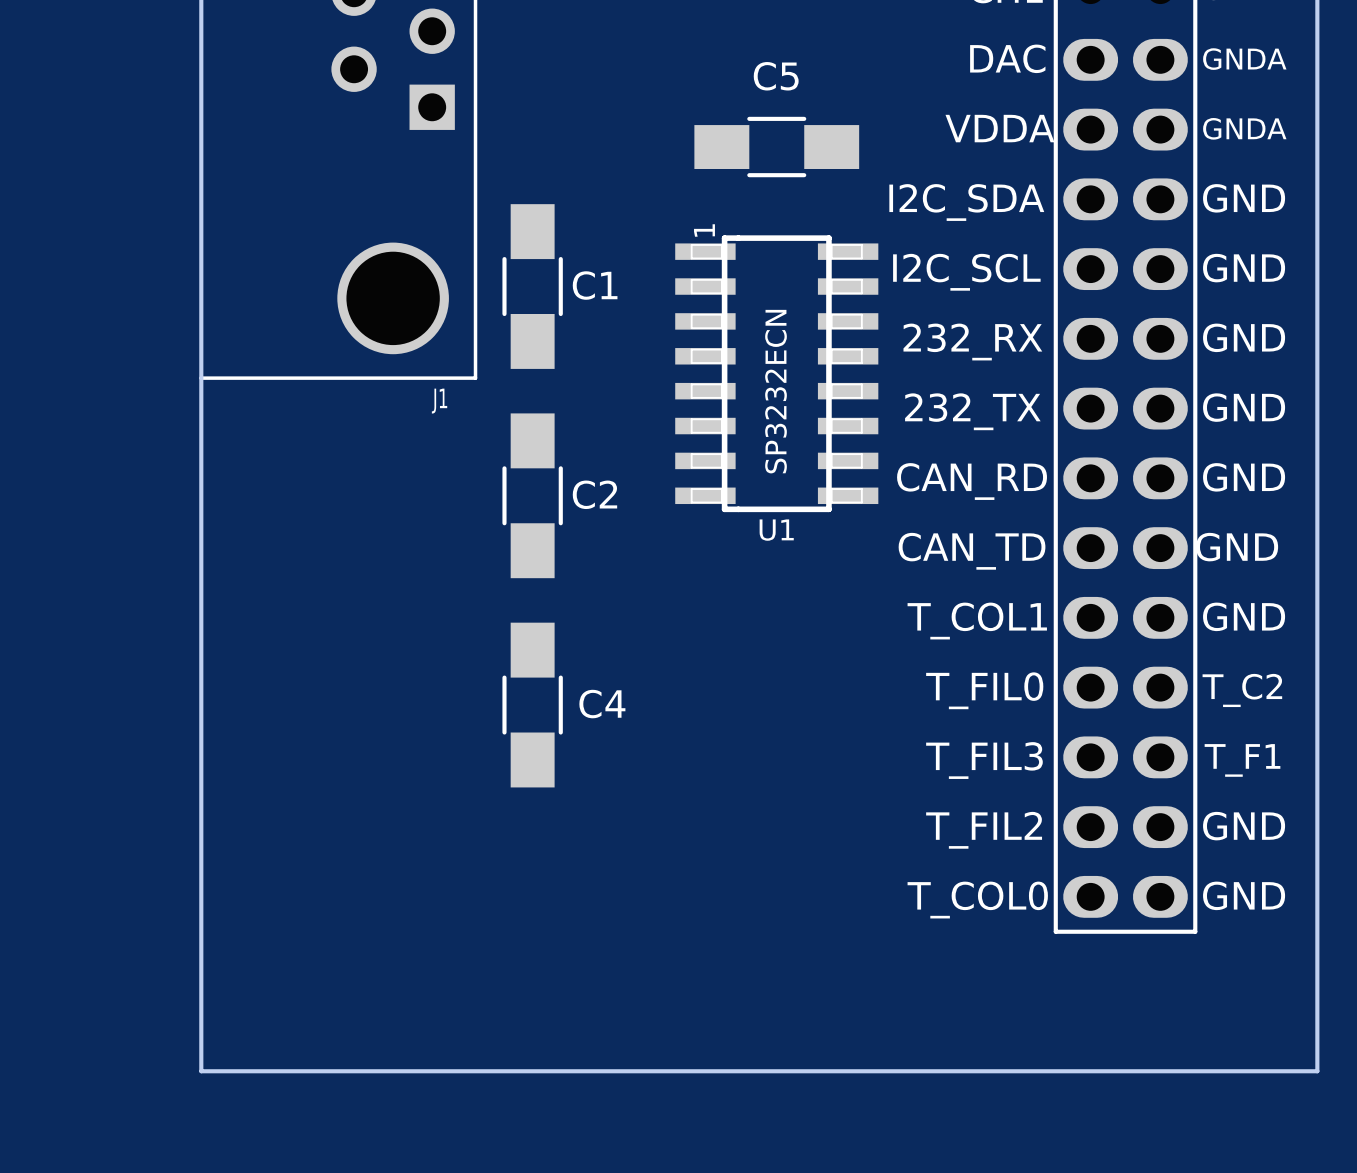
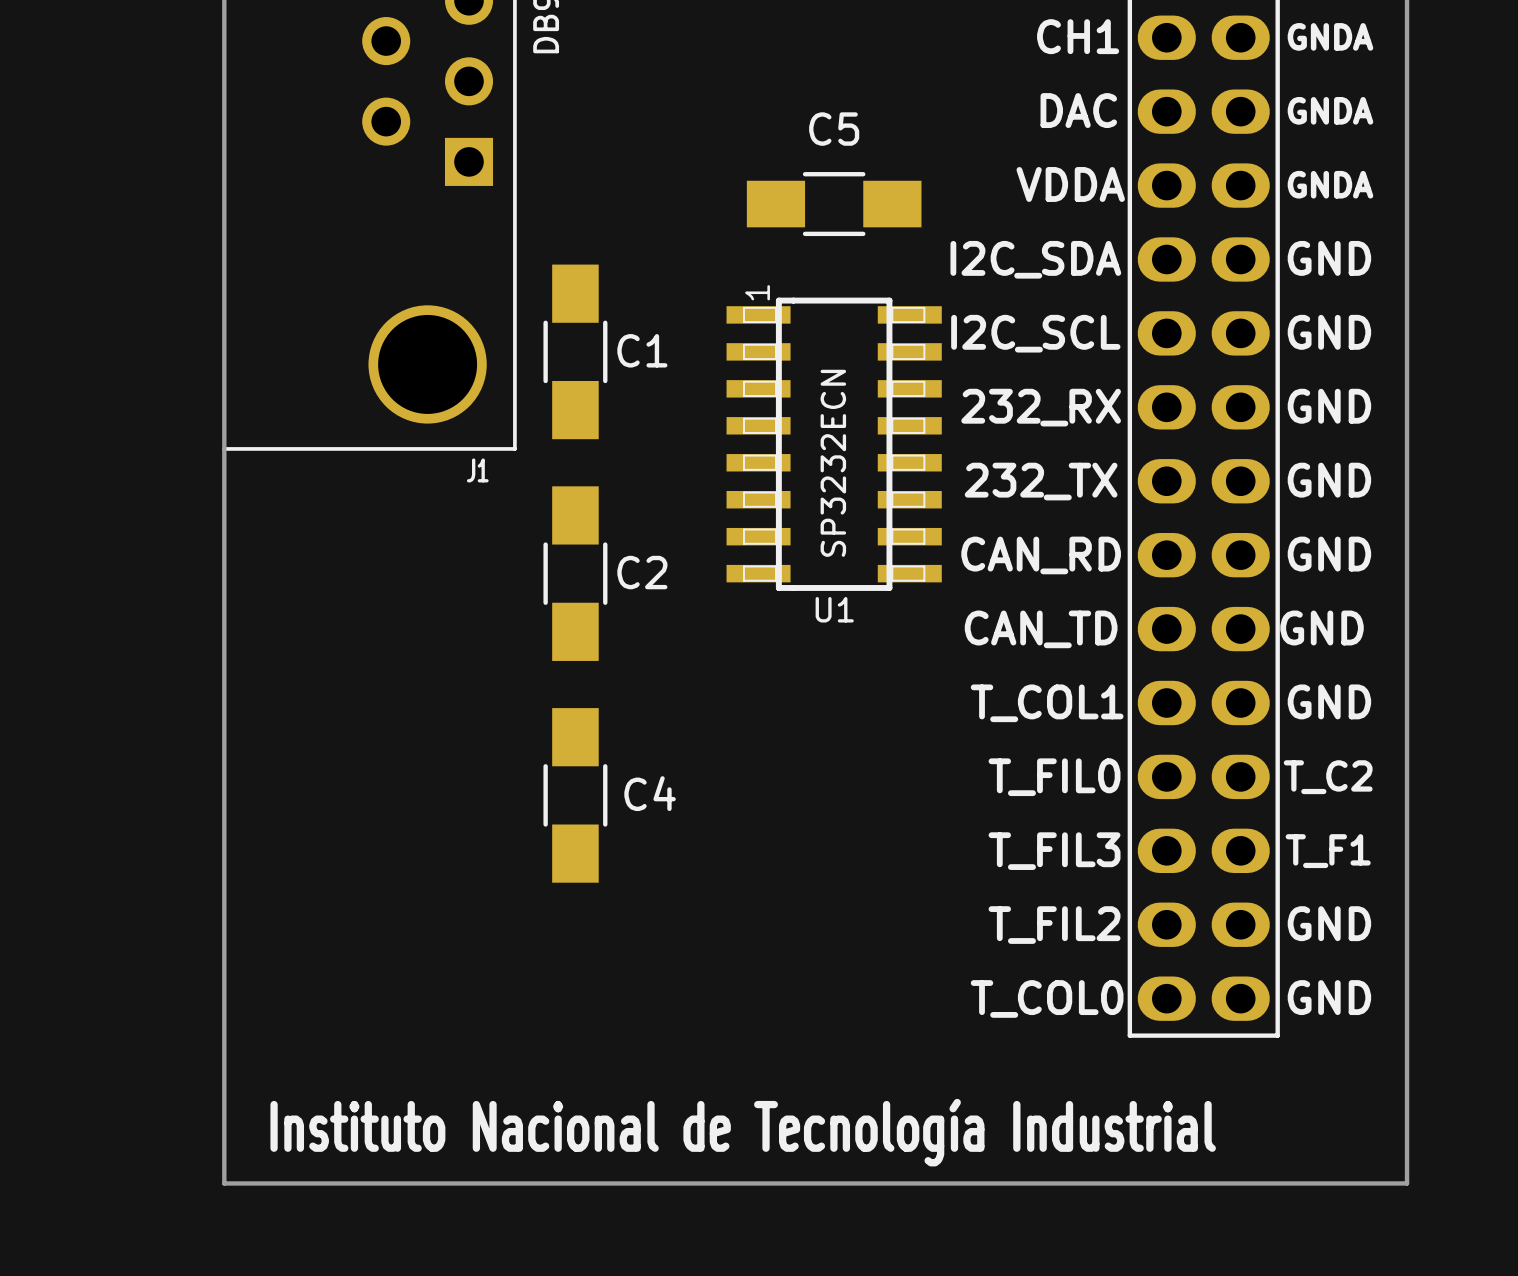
text: none -> Instituto Nacional de Tecnología Industrial (743, 1132)

